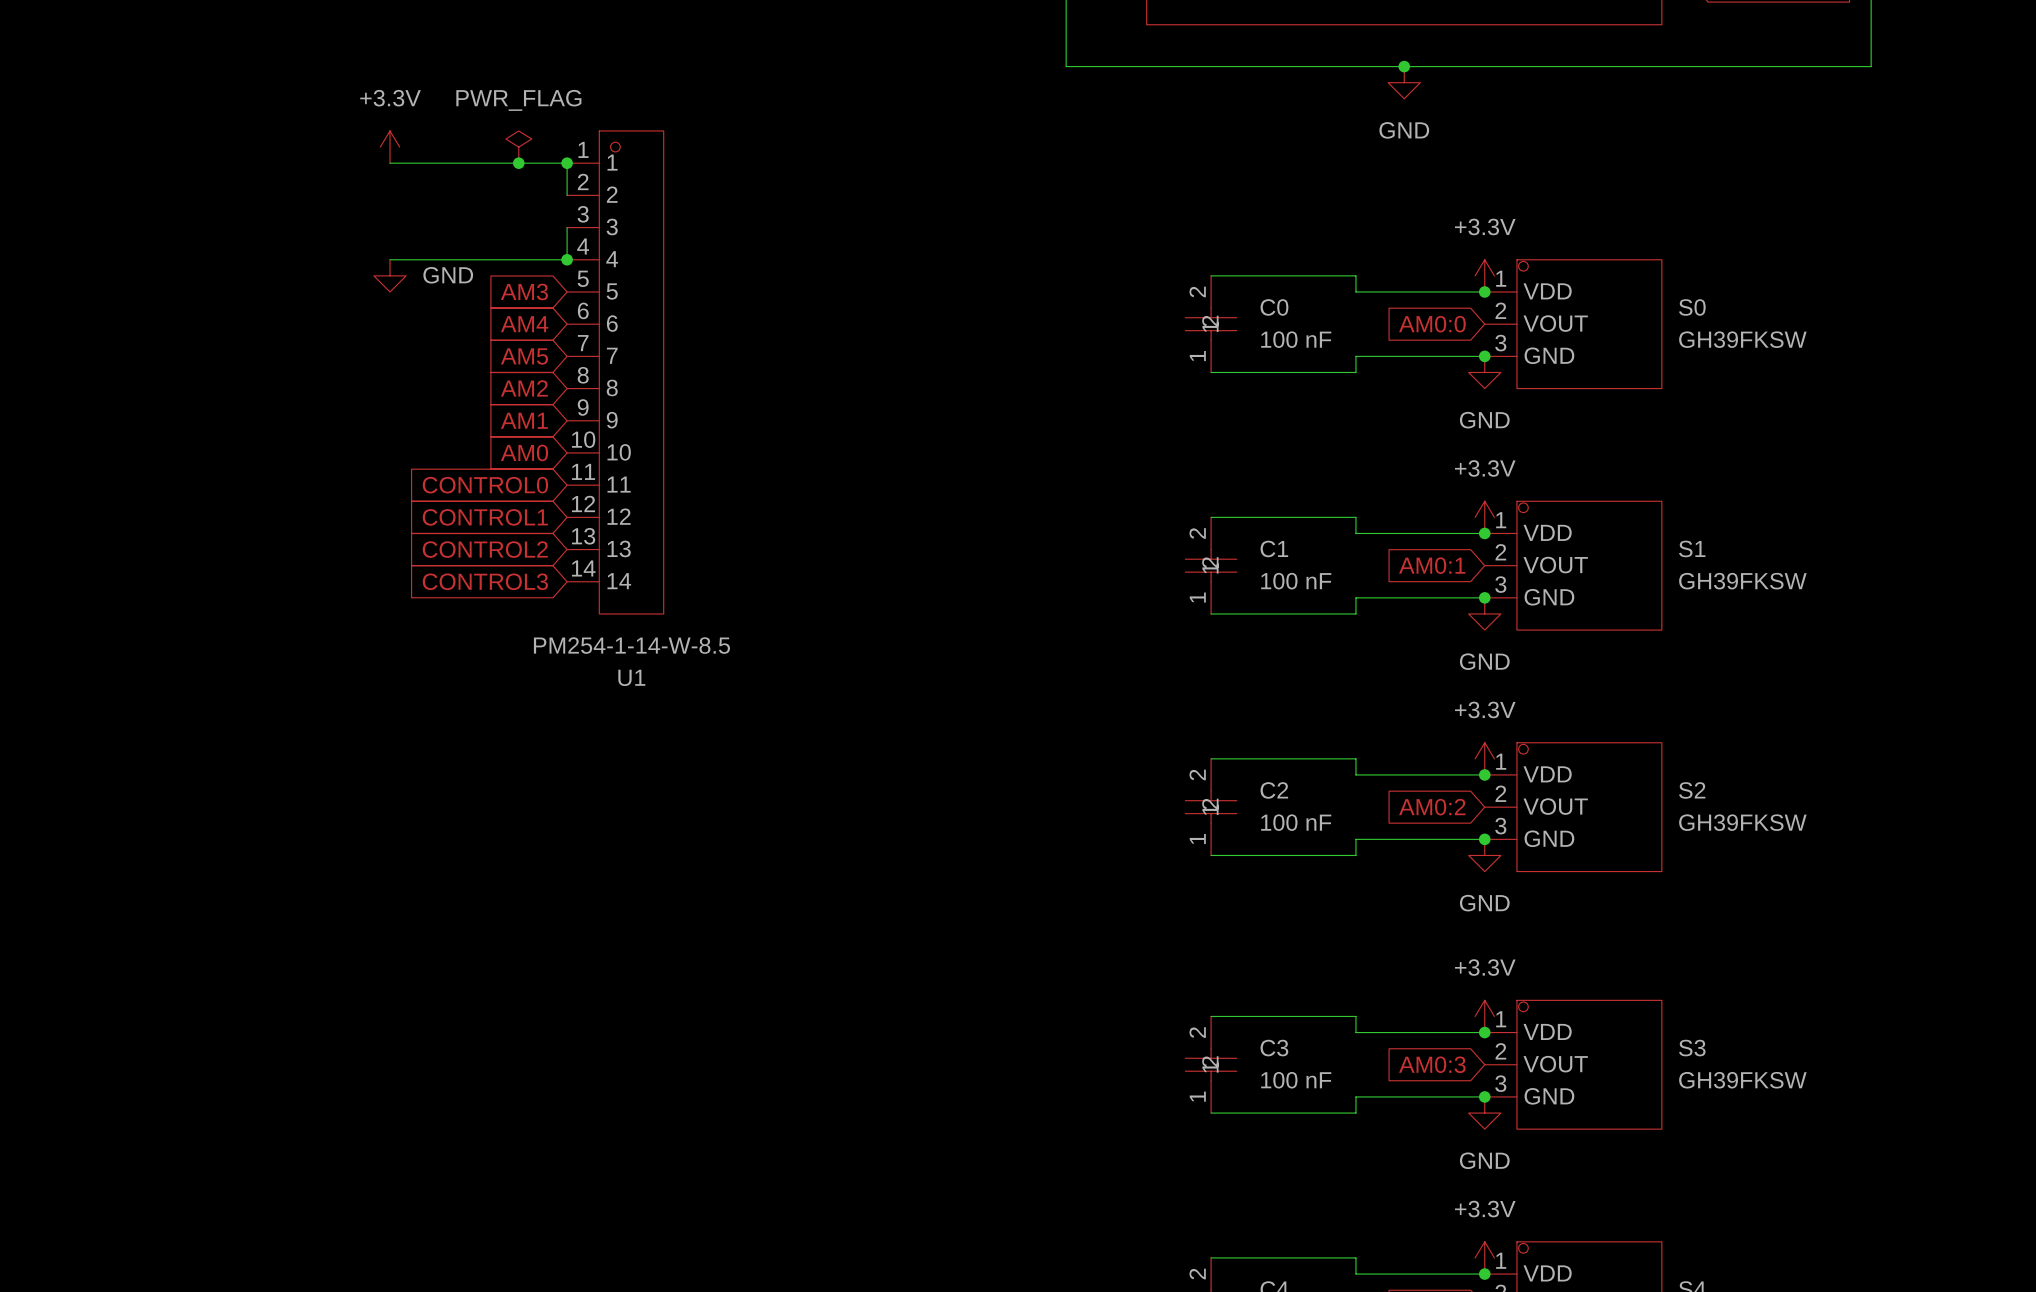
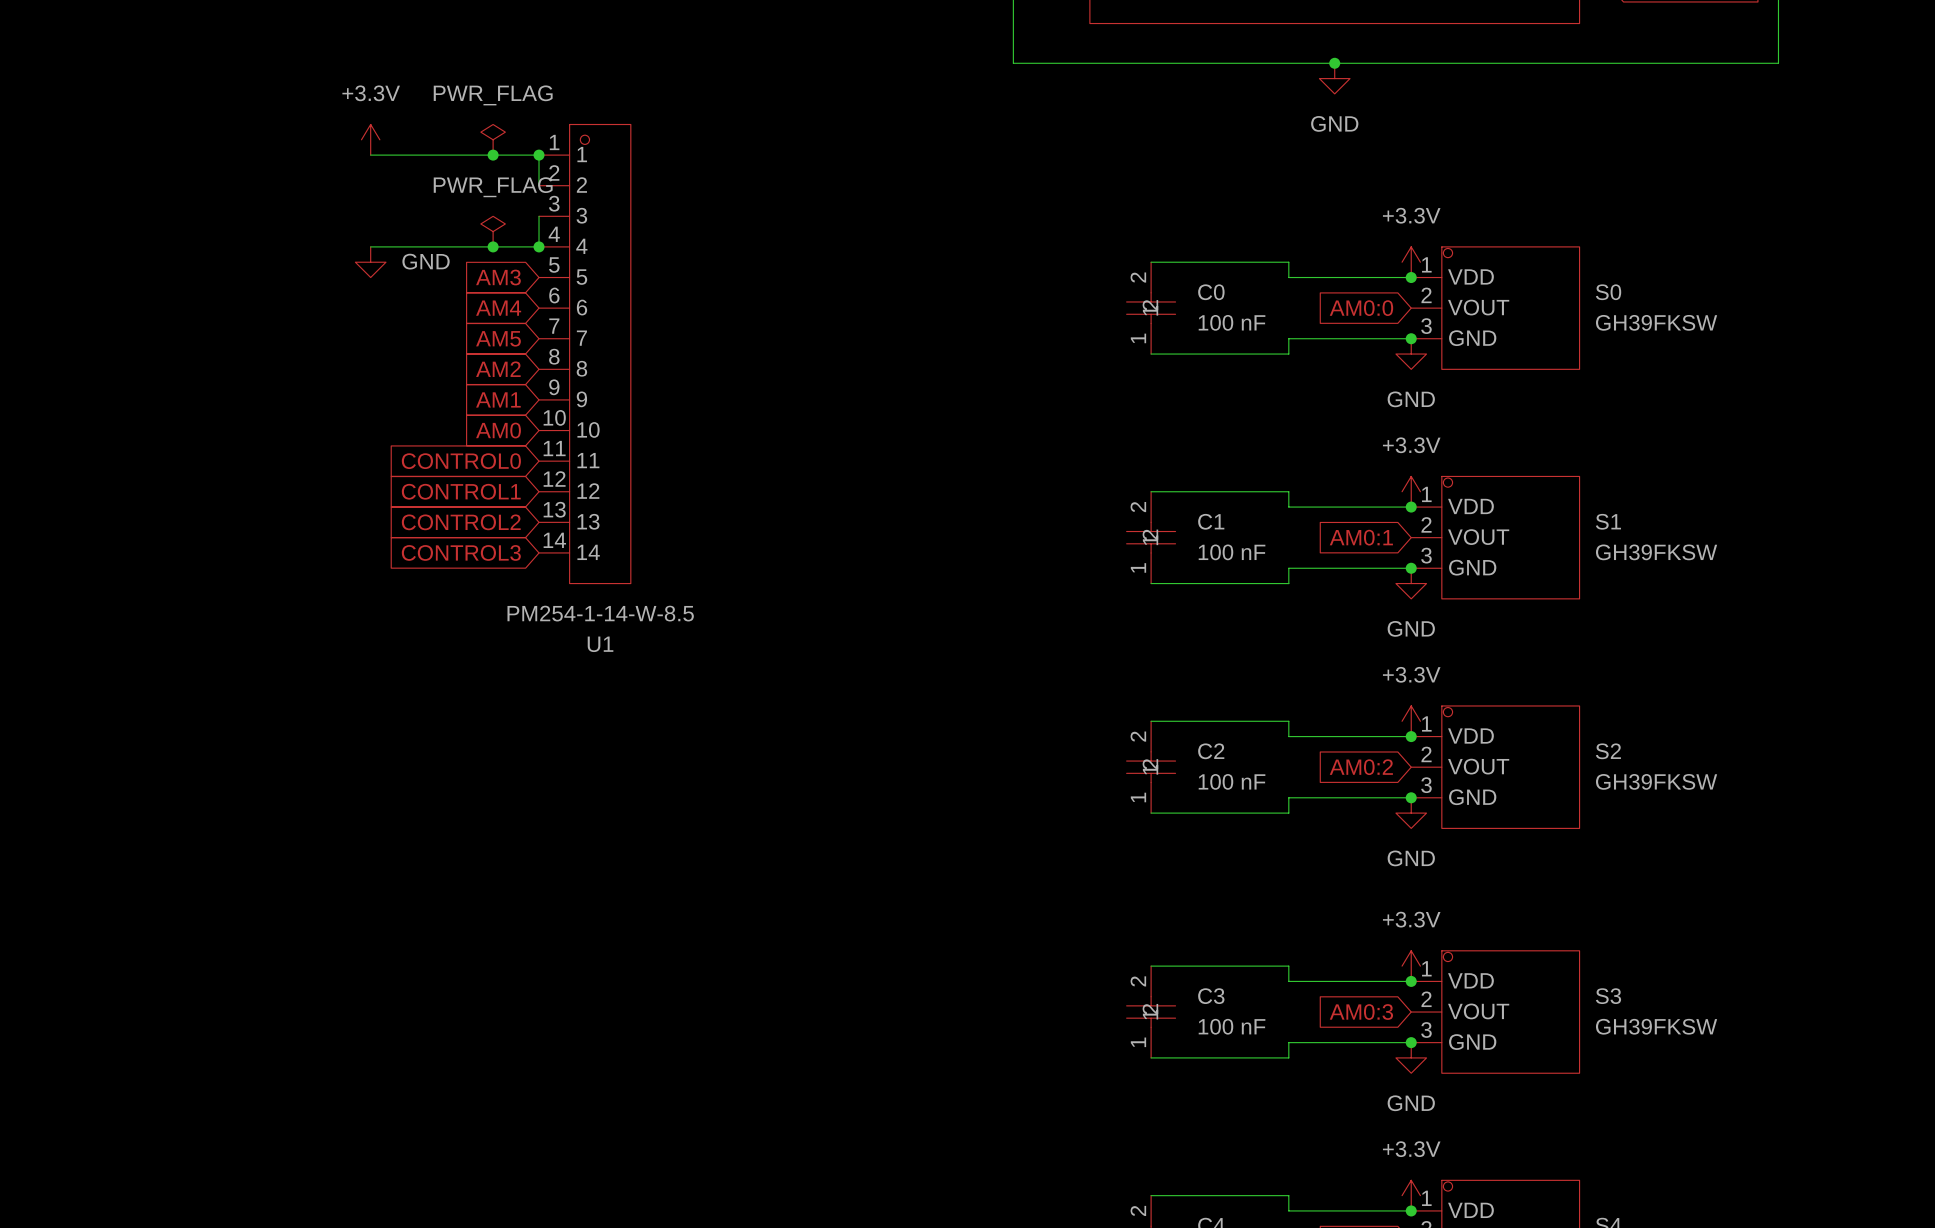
power symbol: none -> PWR_FLAG (493, 231)
junction: none -> (493, 246)

